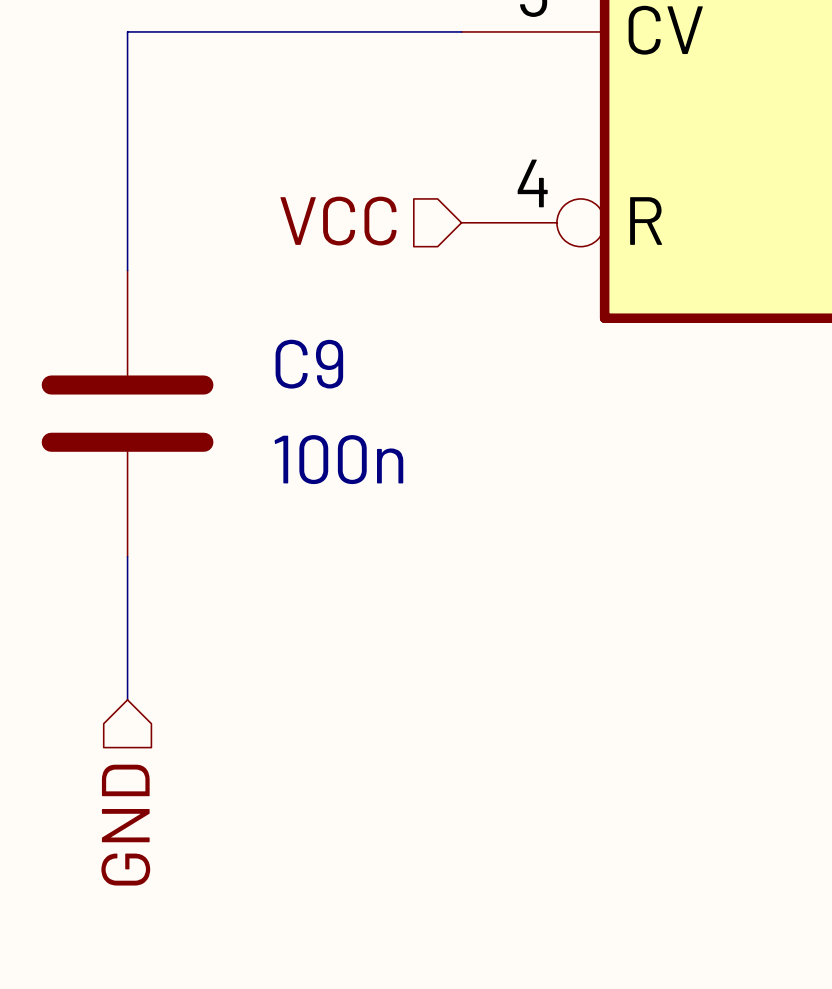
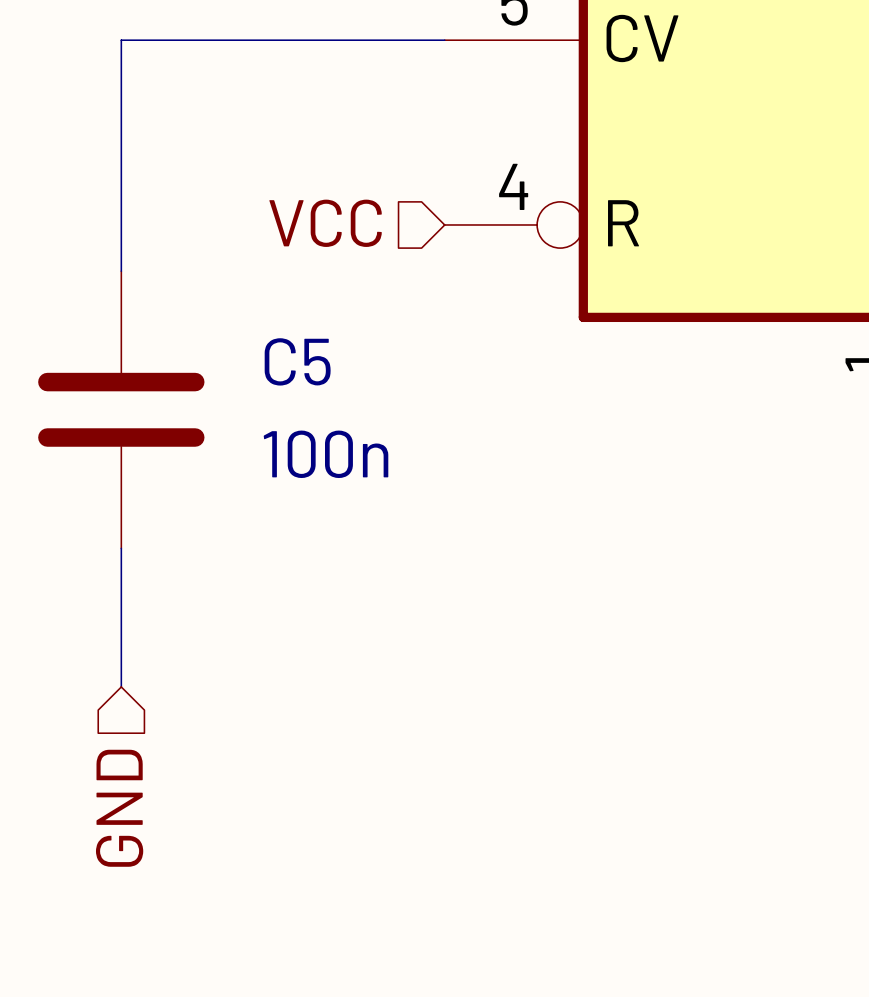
C9 name: C9 (309, 364) -> C5 (297, 361)

